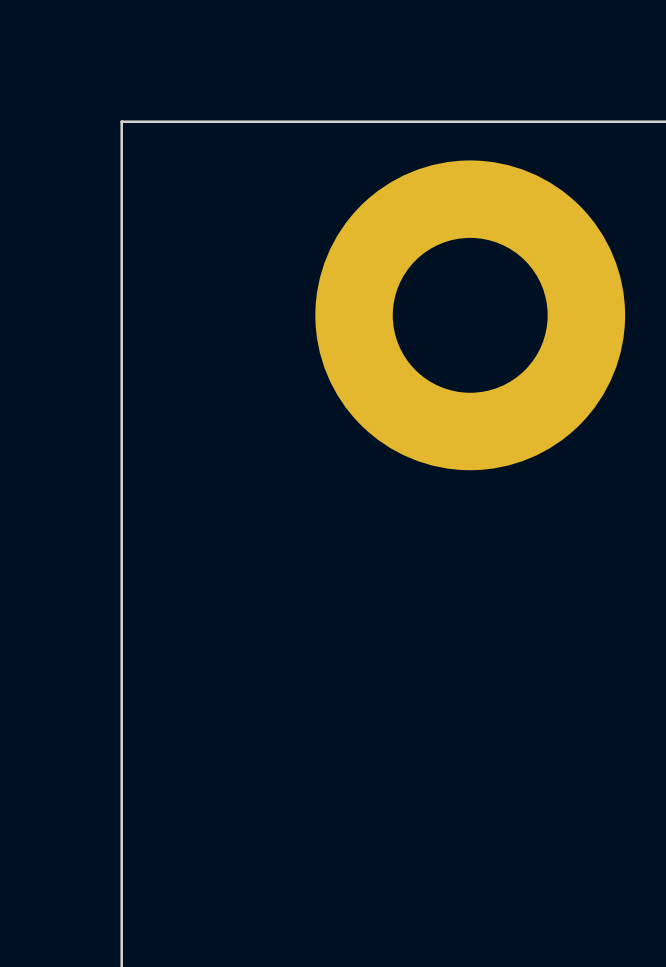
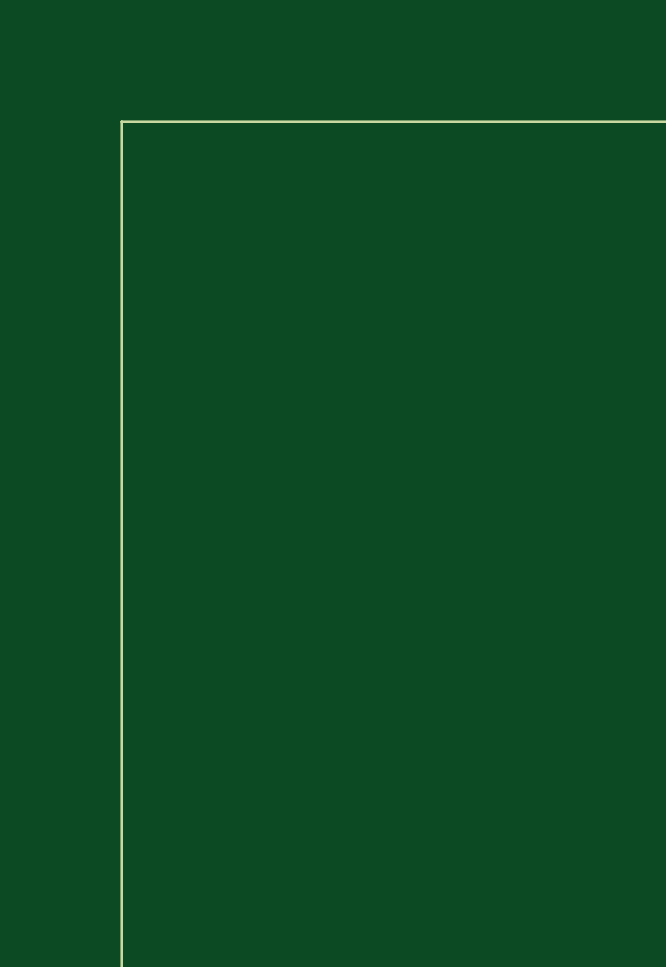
part: (470, 315) -> none

